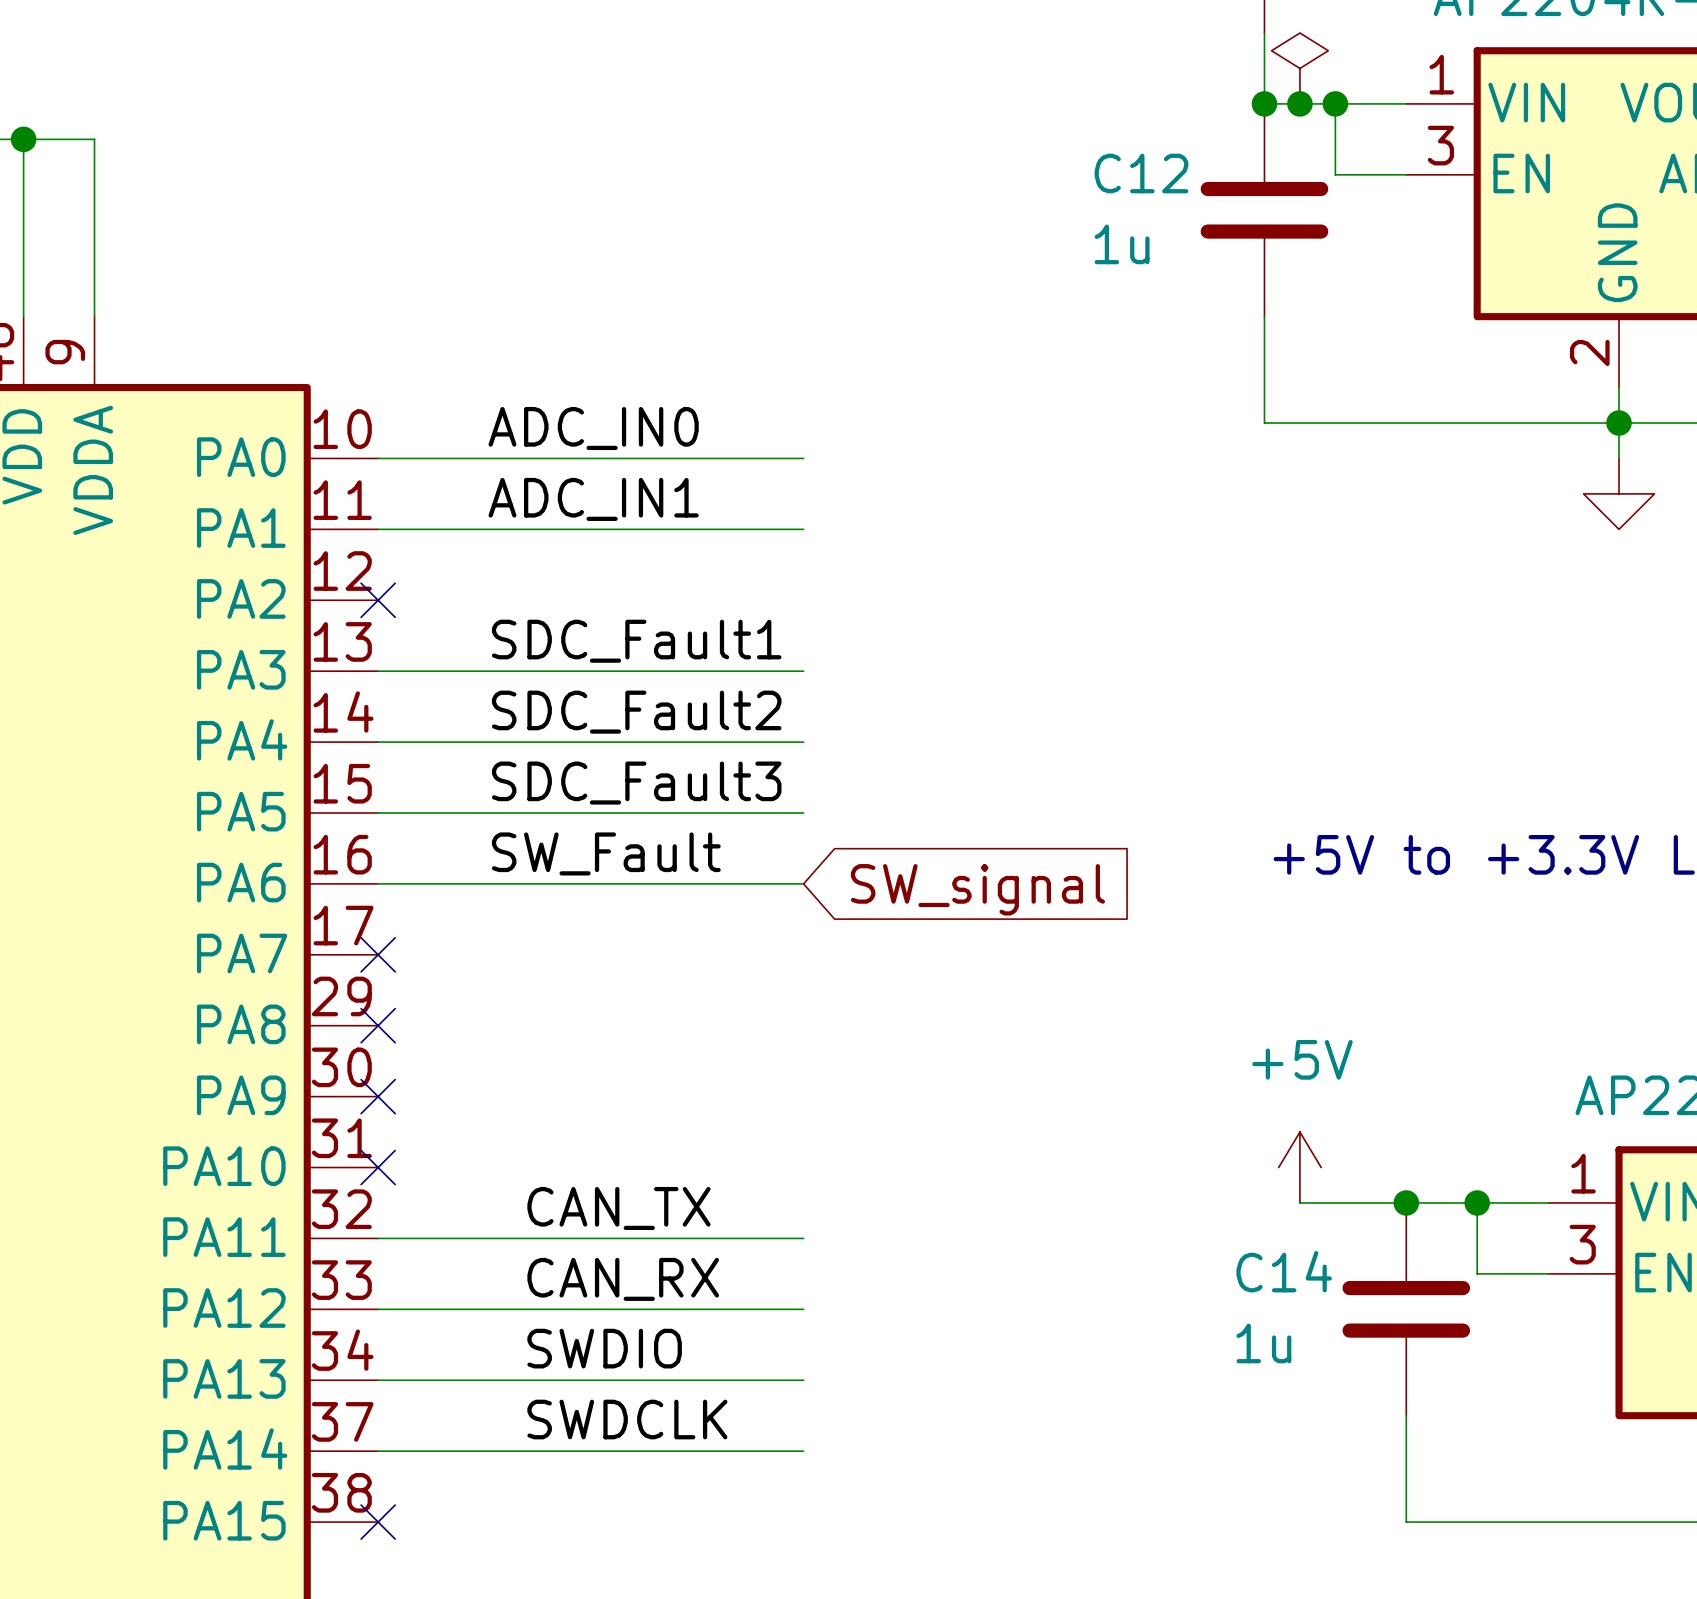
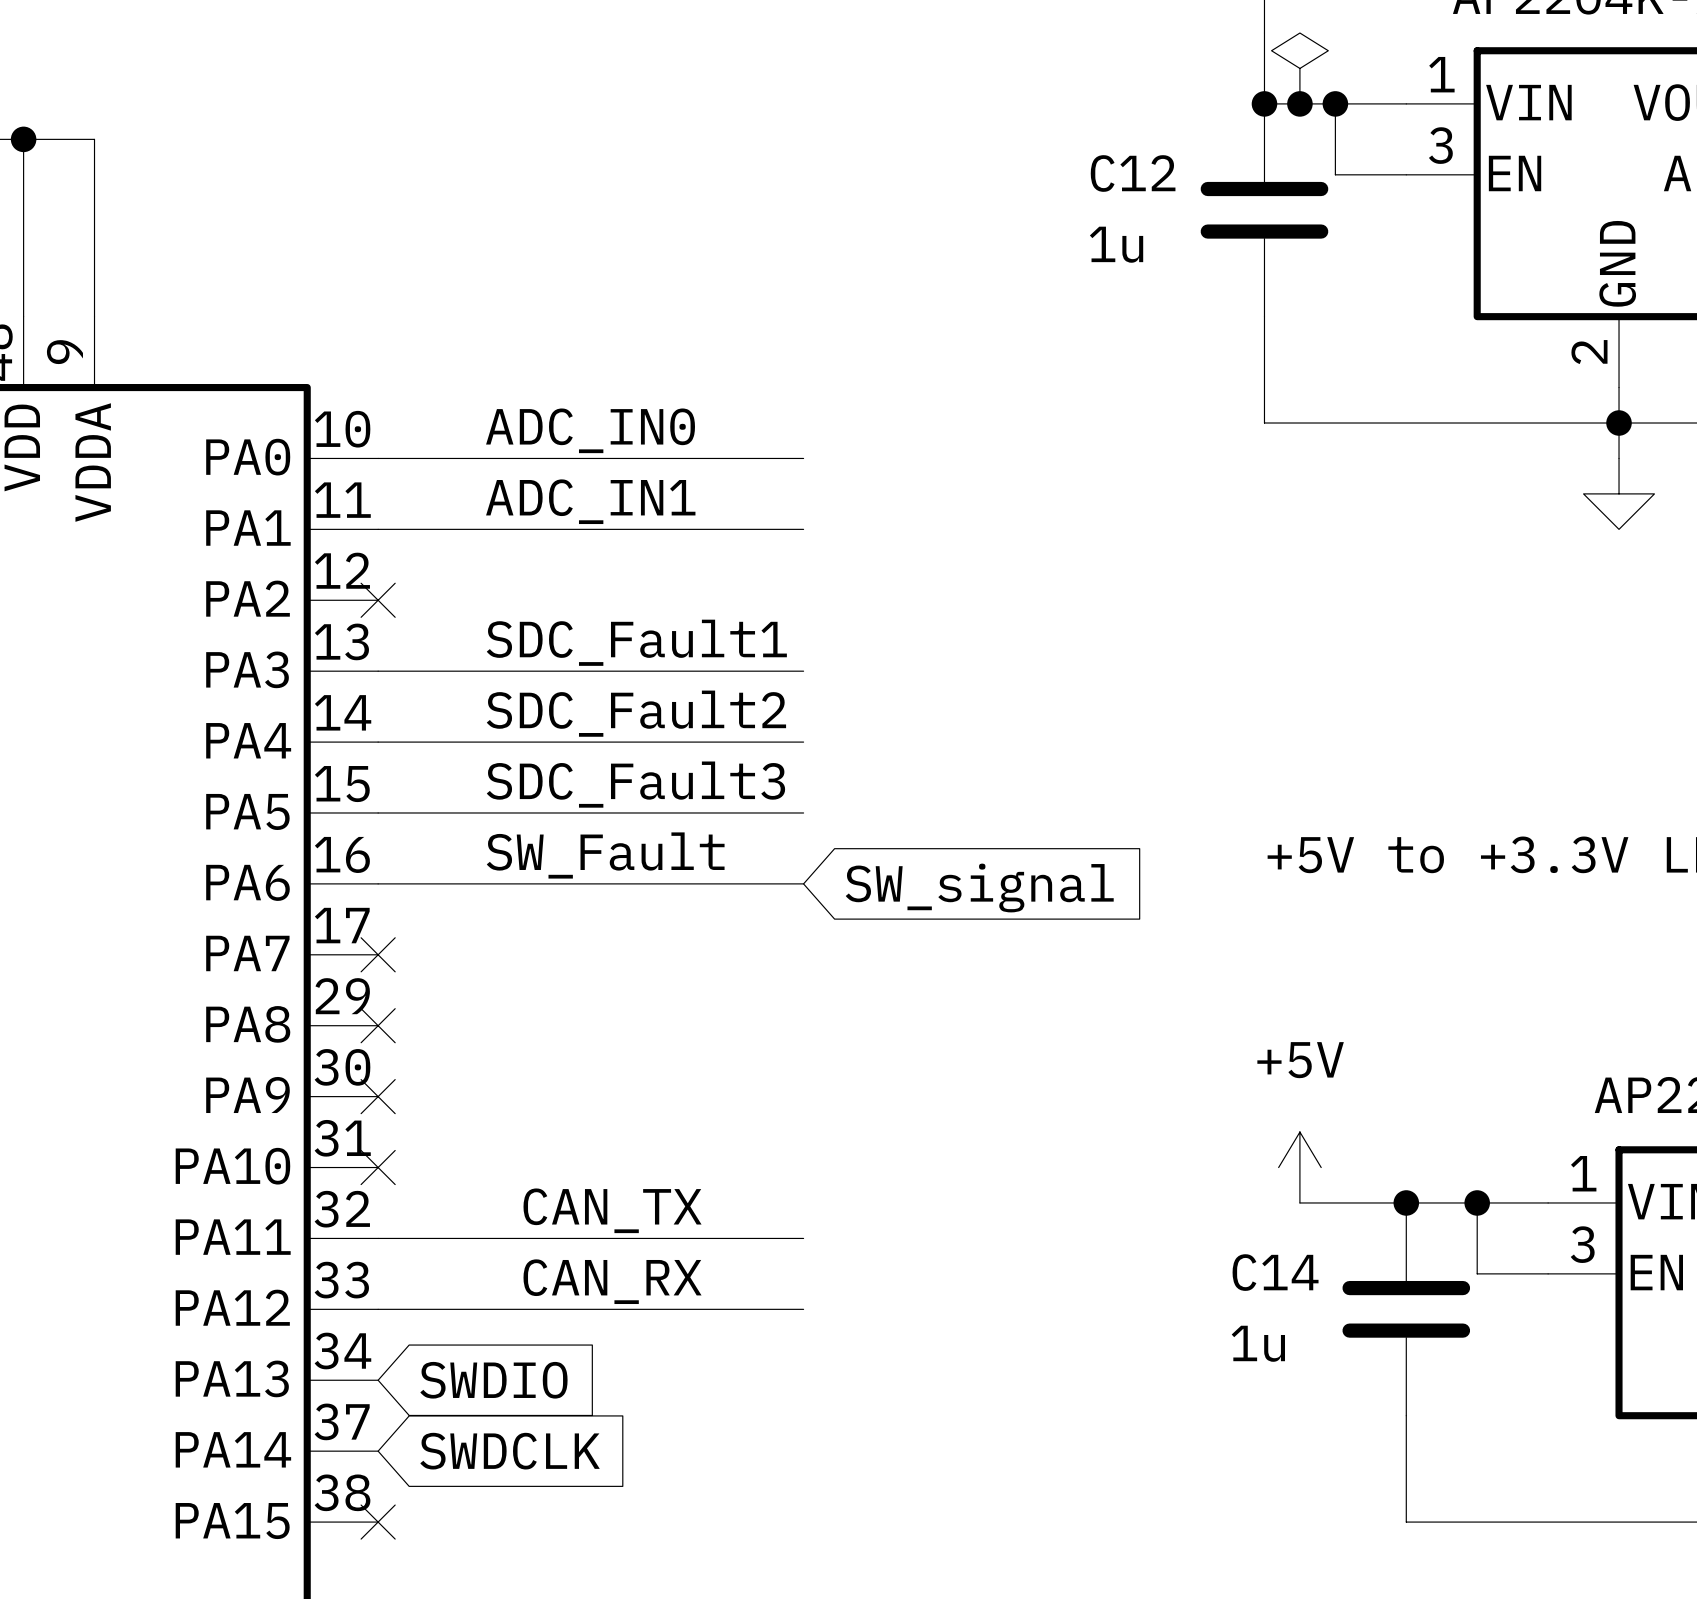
label: SWDIO (604, 1348) -> none
wire: (378, 1380) (803, 1380) -> none
global label: none -> SWDIO (493, 1380)
label: SWDCLK (627, 1419) -> none
wire: (378, 1451) (803, 1451) -> none
global label: none -> SWDCLK (510, 1451)

